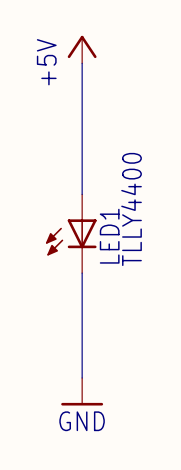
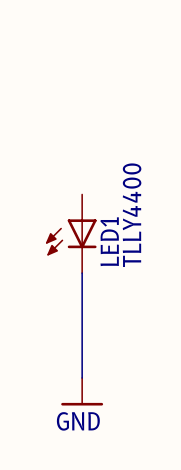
power symbol: +5V (82, 49) -> none
wire: (82, 63) (82, 194) -> none

